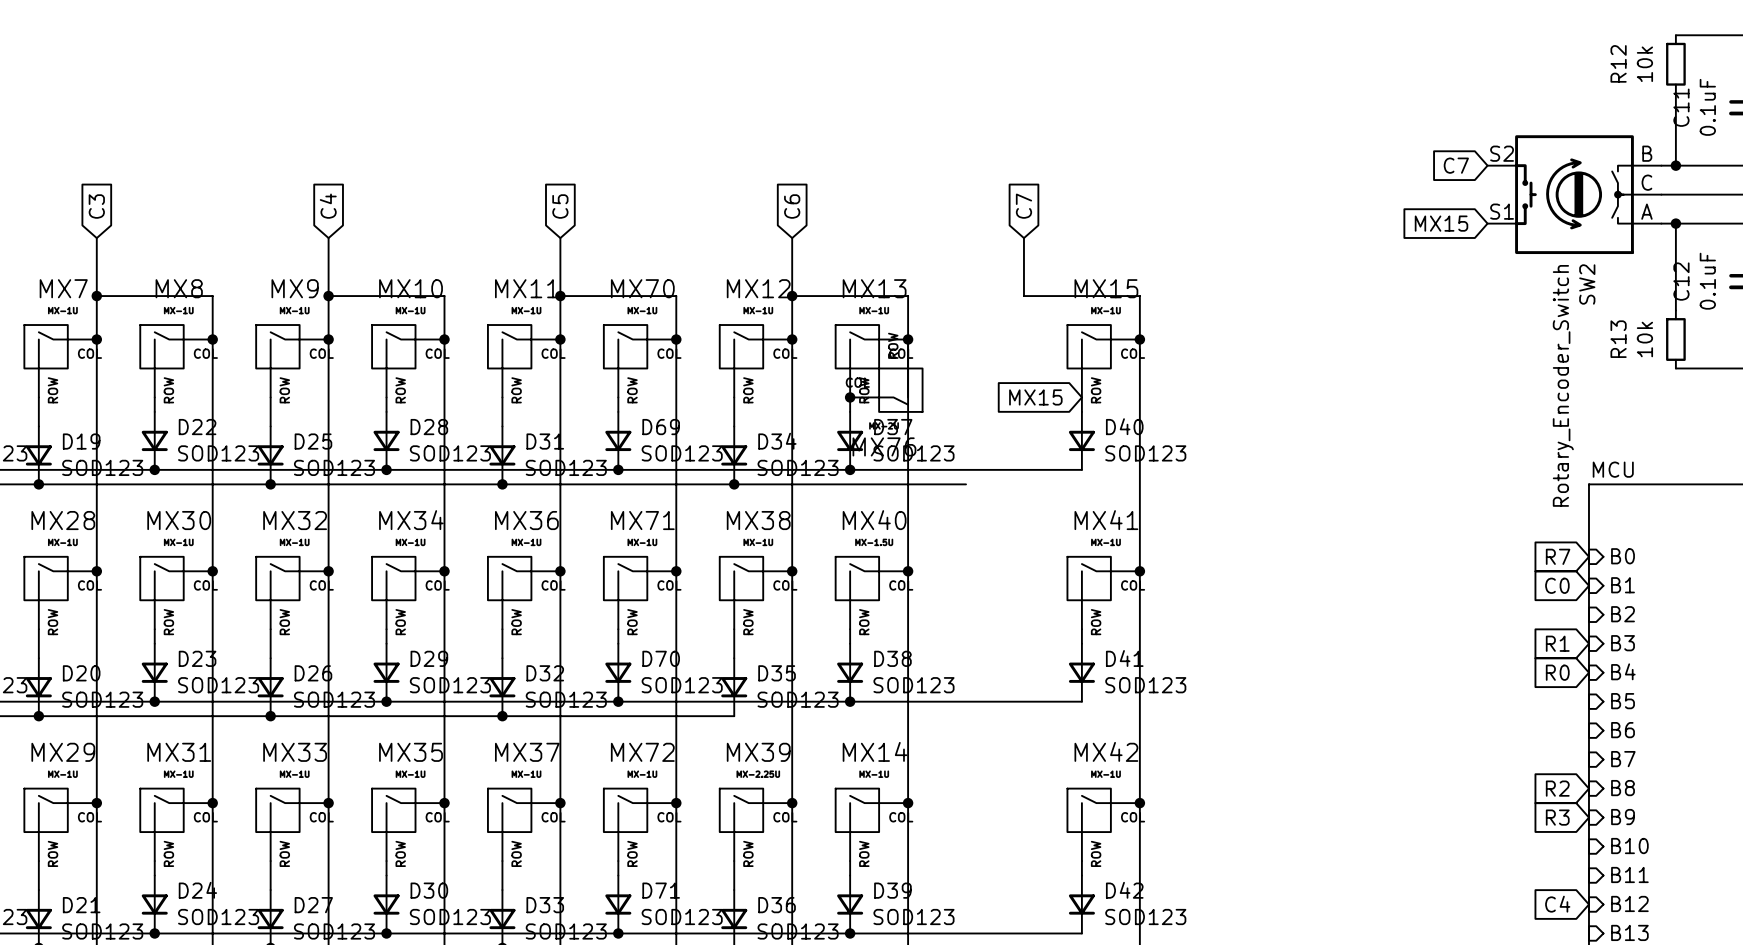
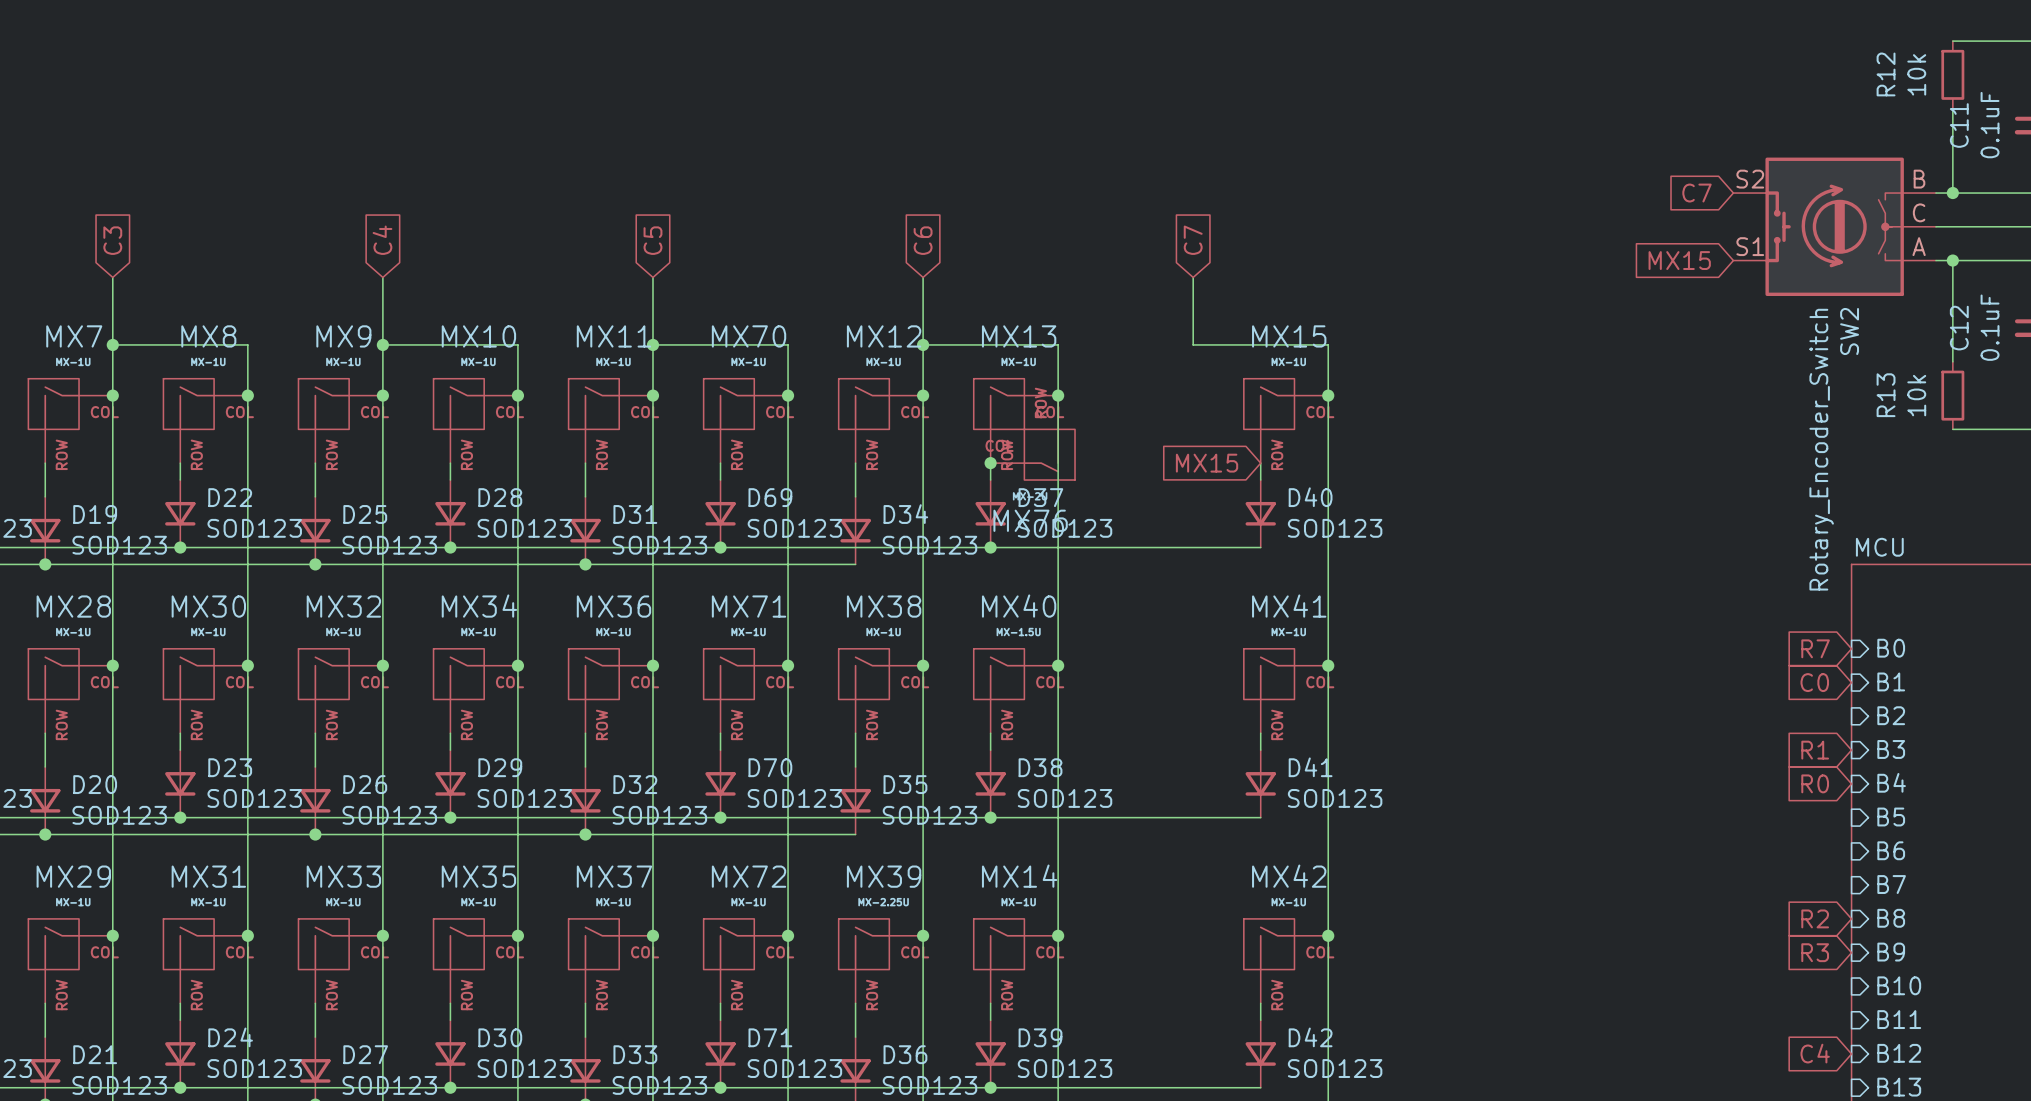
wire: (734, 484) (966, 484) -> none
junction: (734, 484) -> none

